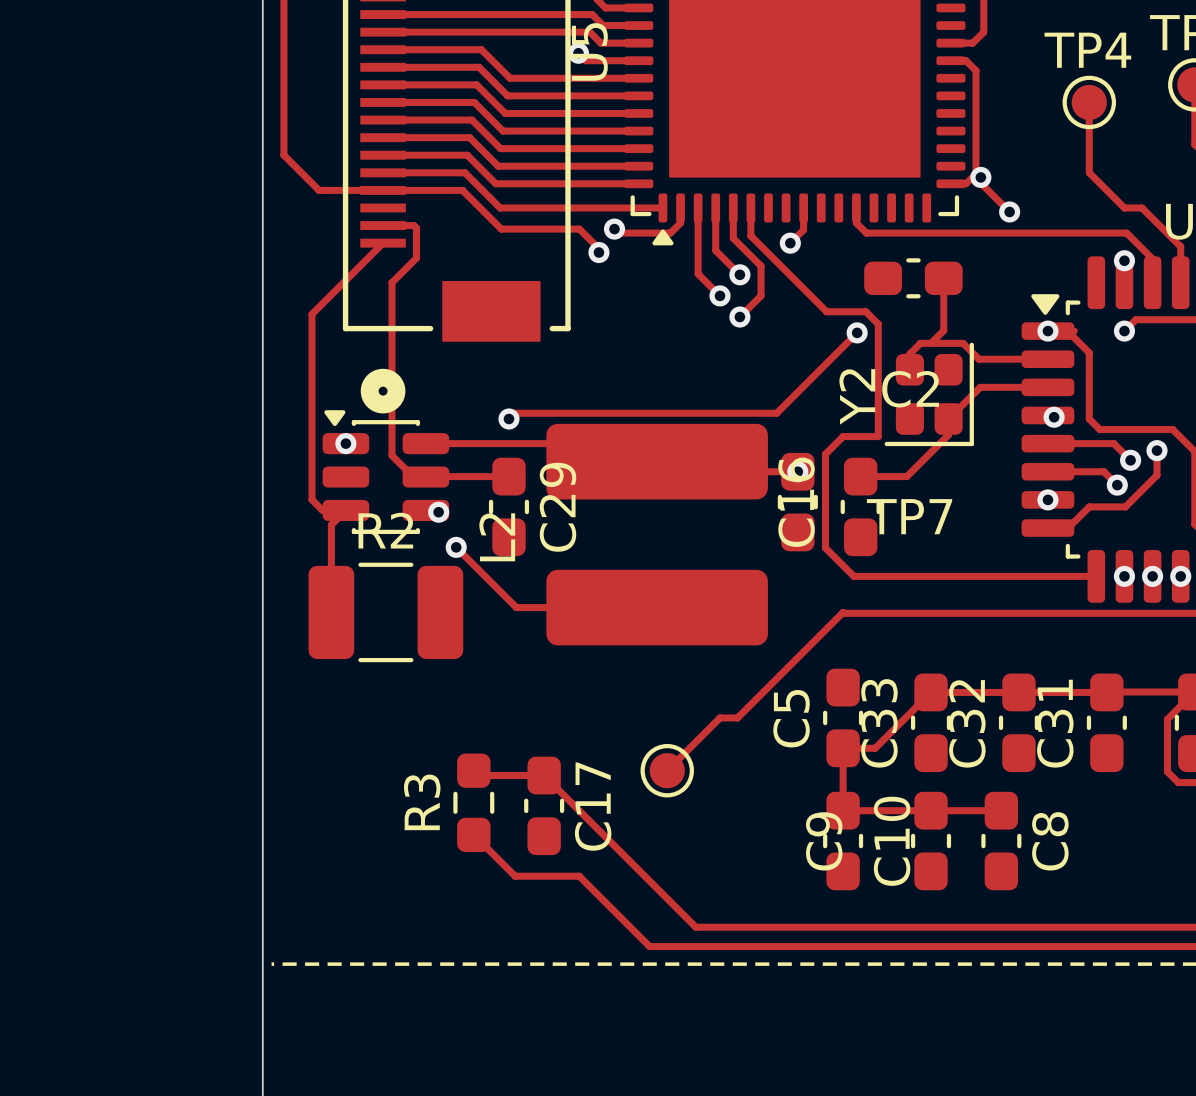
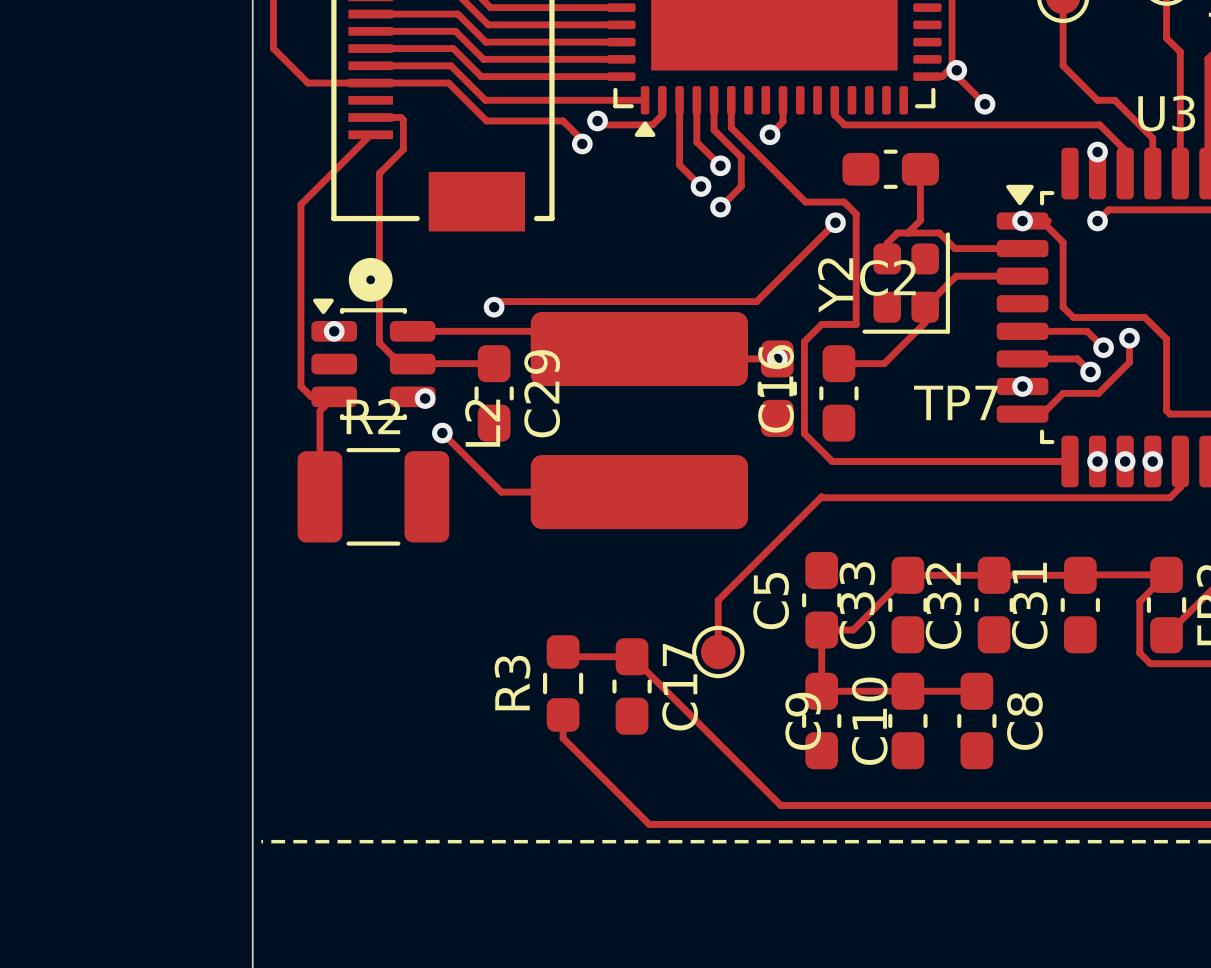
via: (1054, 417) -> none
track: (737, 717) (720, 717) (667, 770) -> (718, 600) (718, 652)
track: (473, 770) (478, 775) (544, 775) (695, 927) (801, 927) -> (563, 652) (567, 656) (632, 656) (780, 805)
TP7 position: (667, 770) -> (718, 652)
R3 position: (473, 802) -> (563, 683)
C17 position: (544, 805) -> (632, 686)
track: (473, 834) (515, 876) (579, 876) (649, 946) (667, 946) -> (563, 714) (563, 738) (649, 824)

